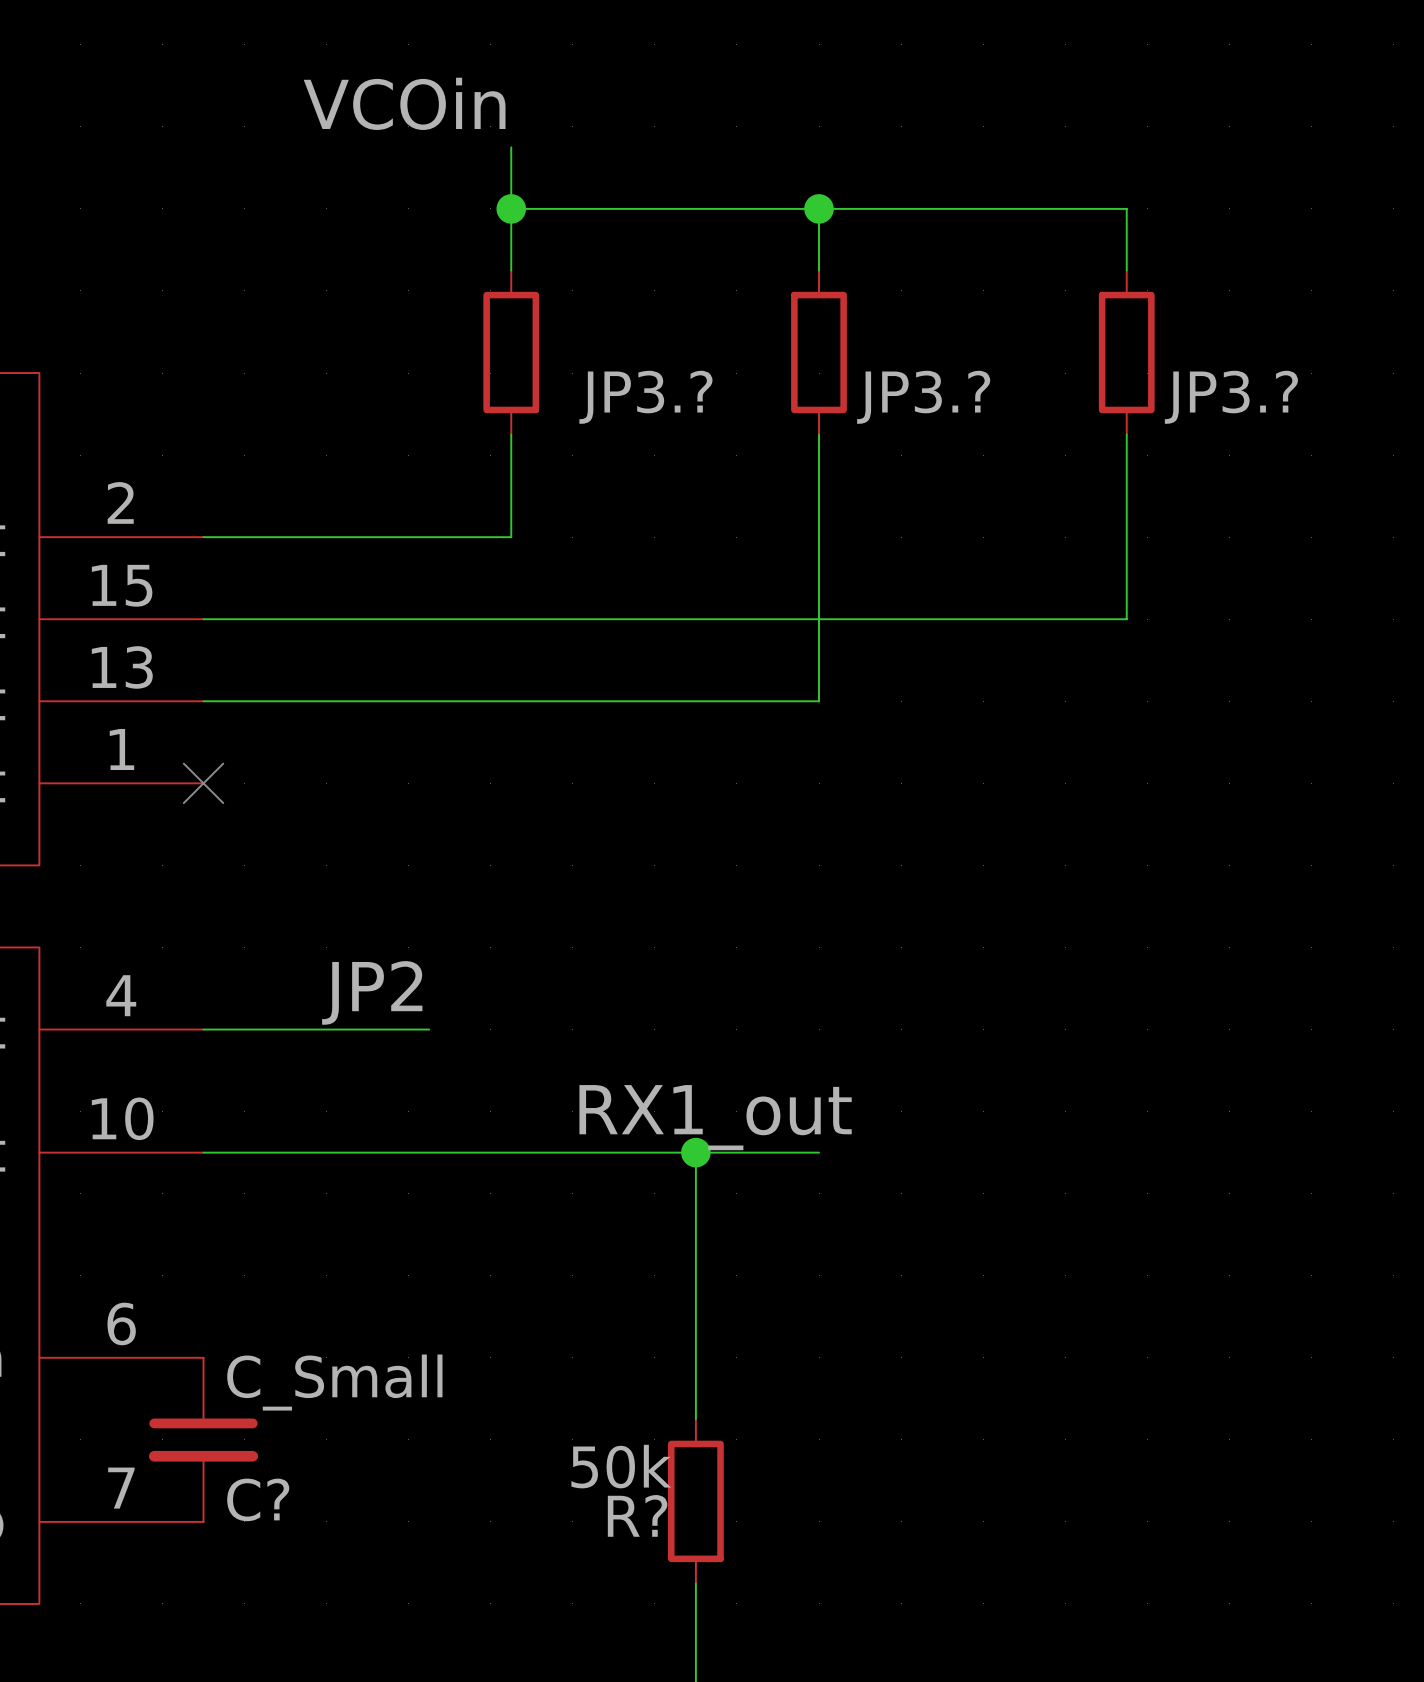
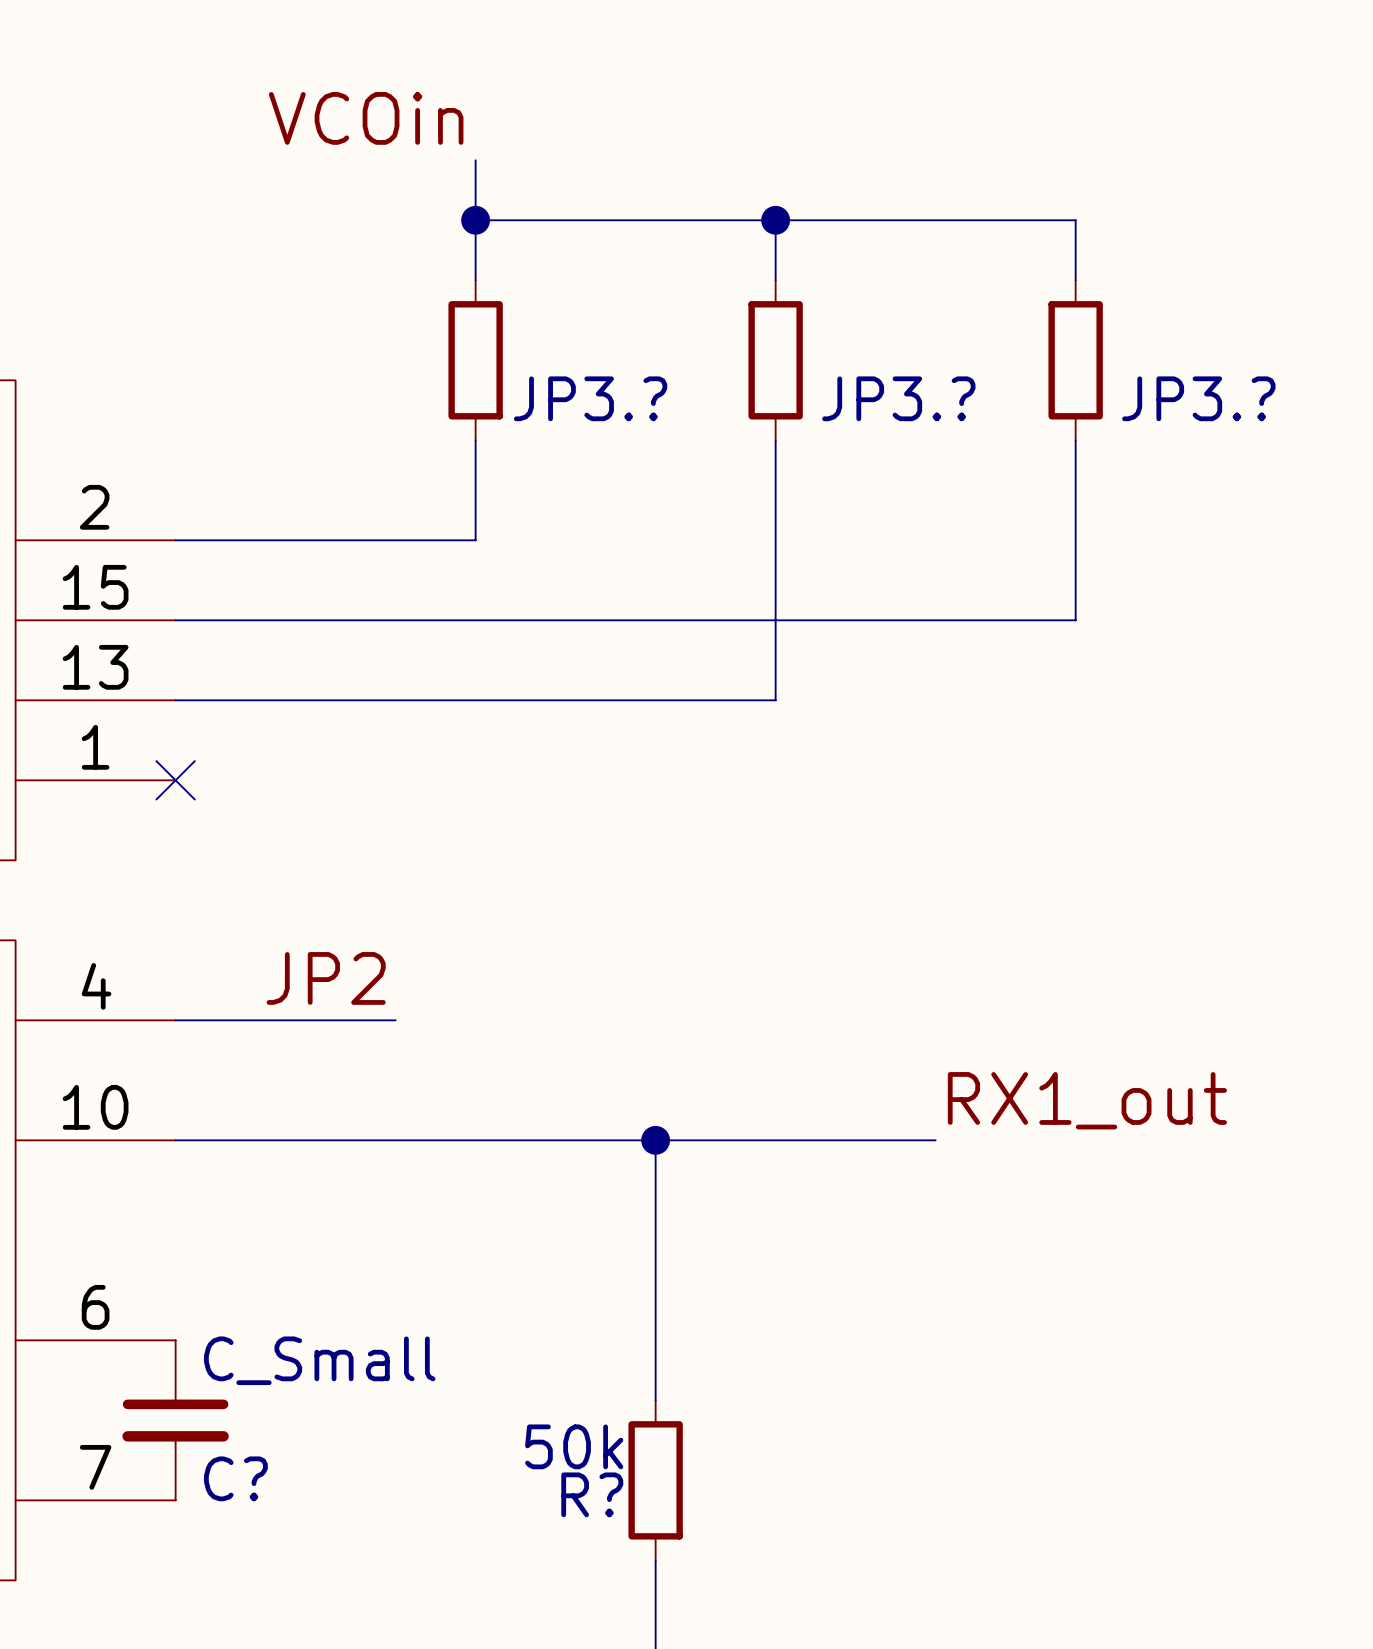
label position: RX1_out (715, 1117) -> RX1_out (1087, 1100)
wire: none -> (775, 1140) (935, 1140)

